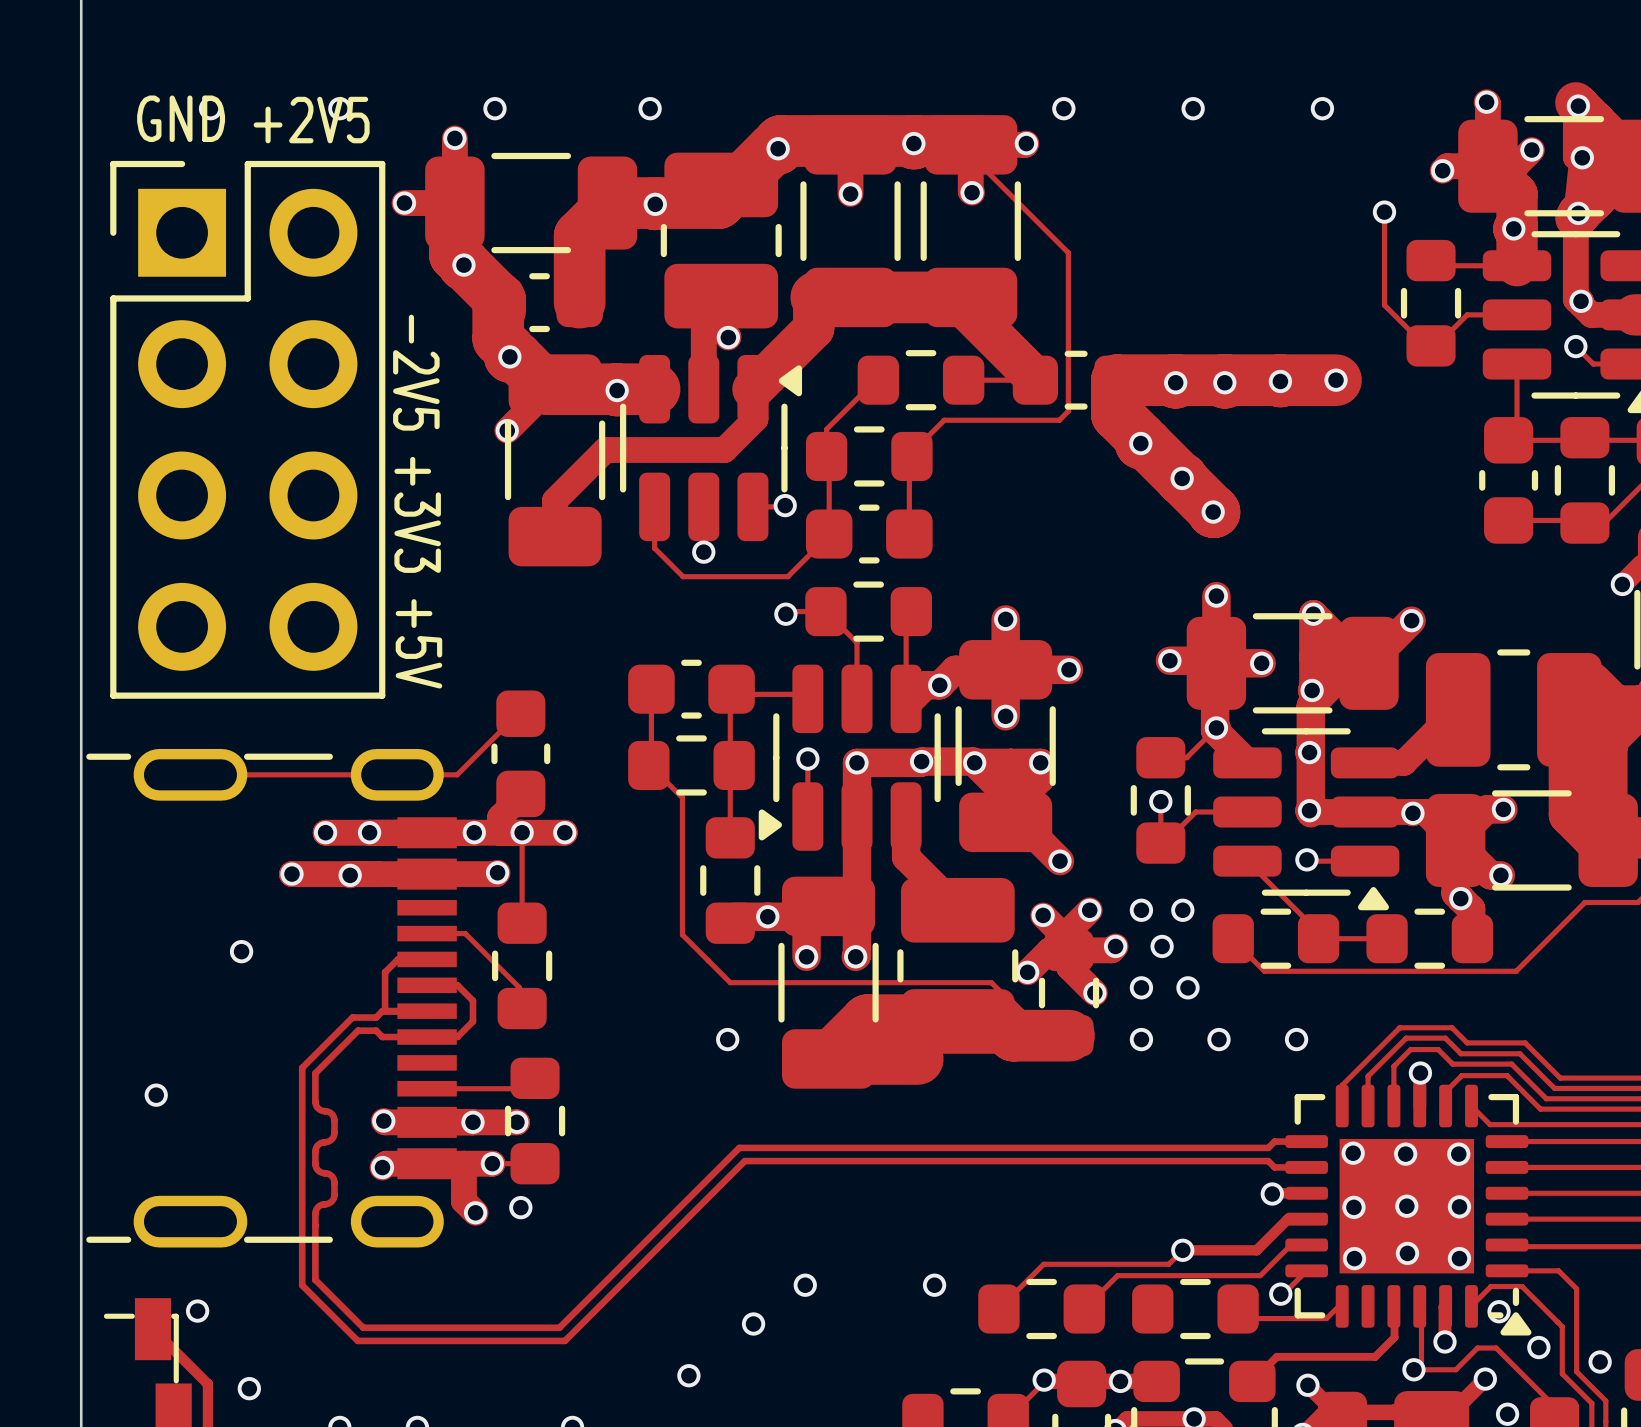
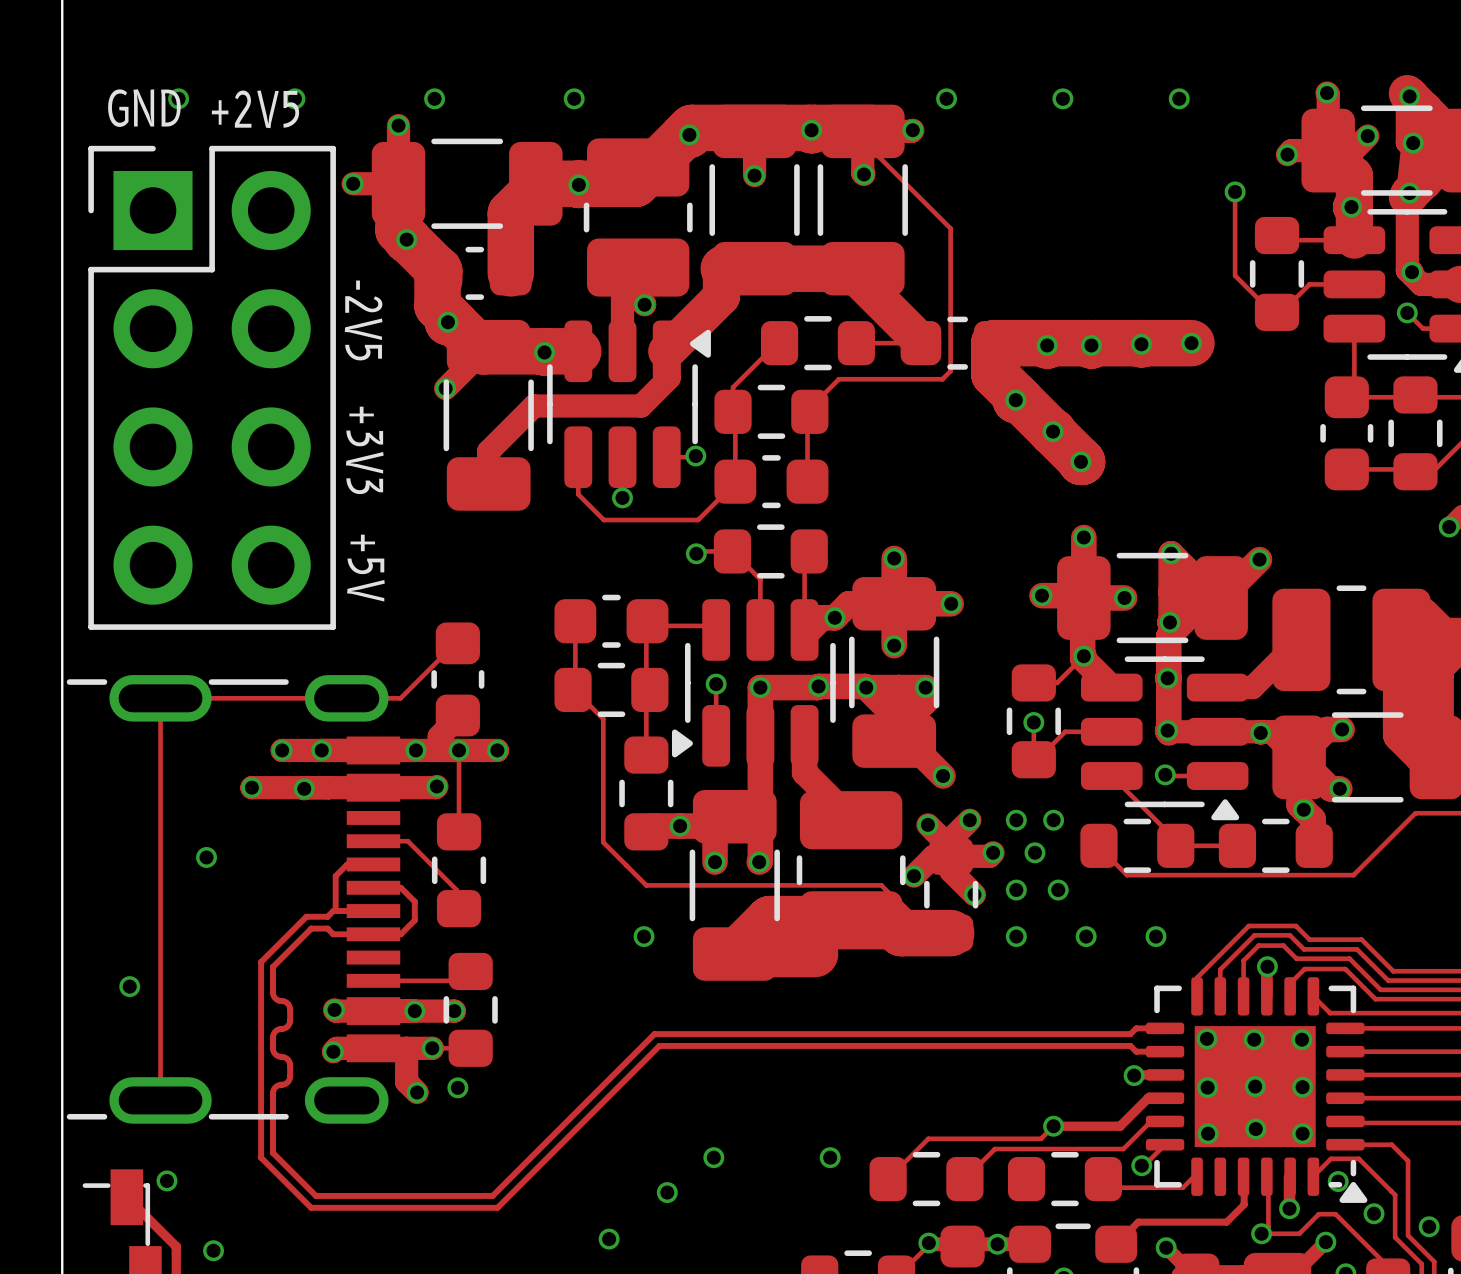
track: none -> (160, 698) (160, 1098) (162, 1100)

